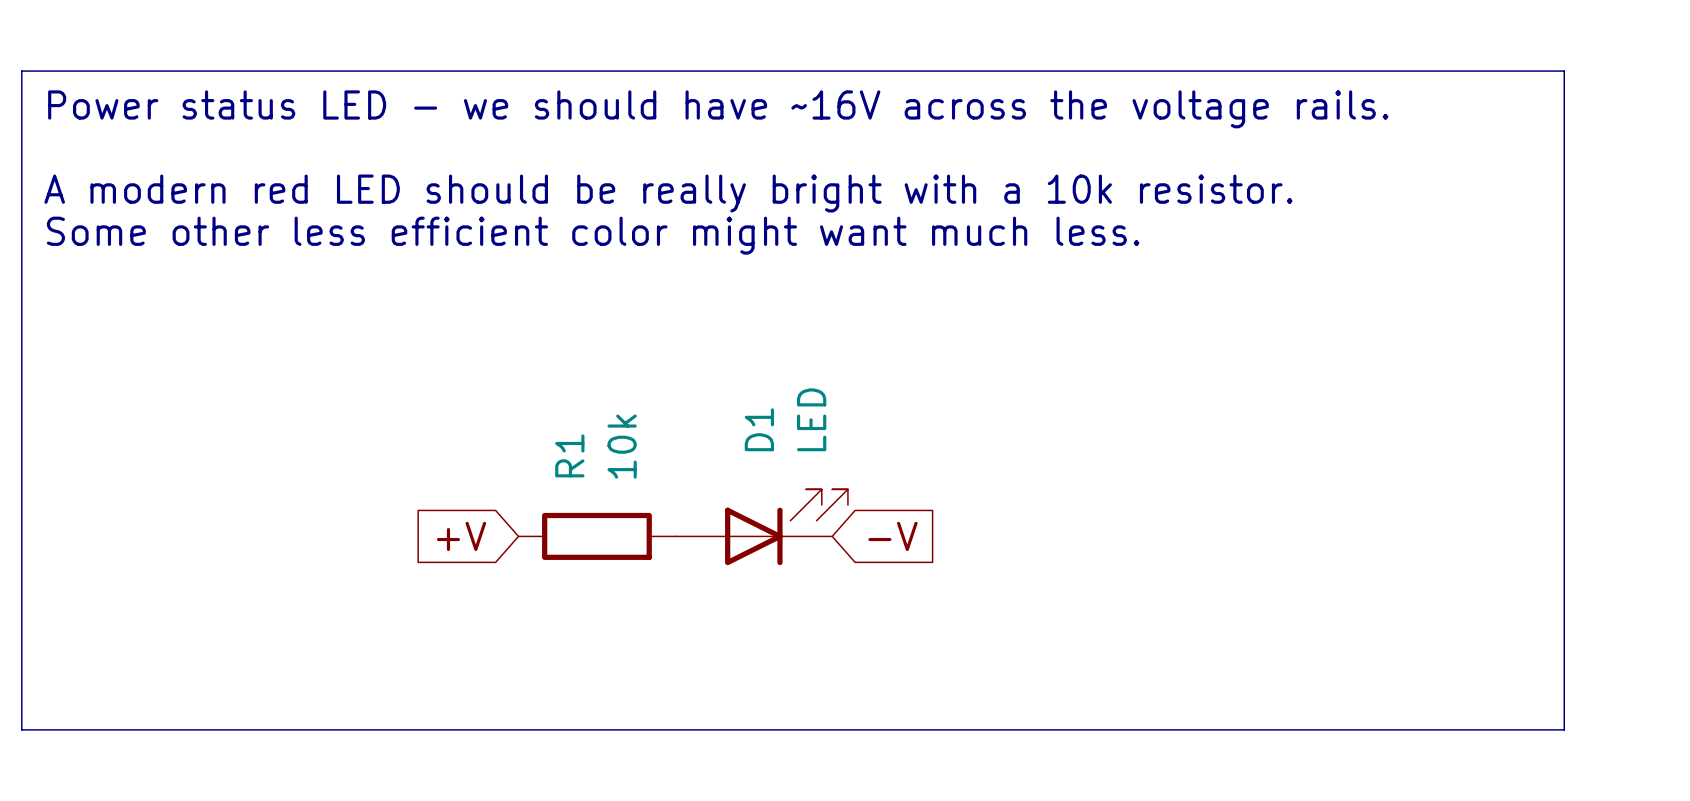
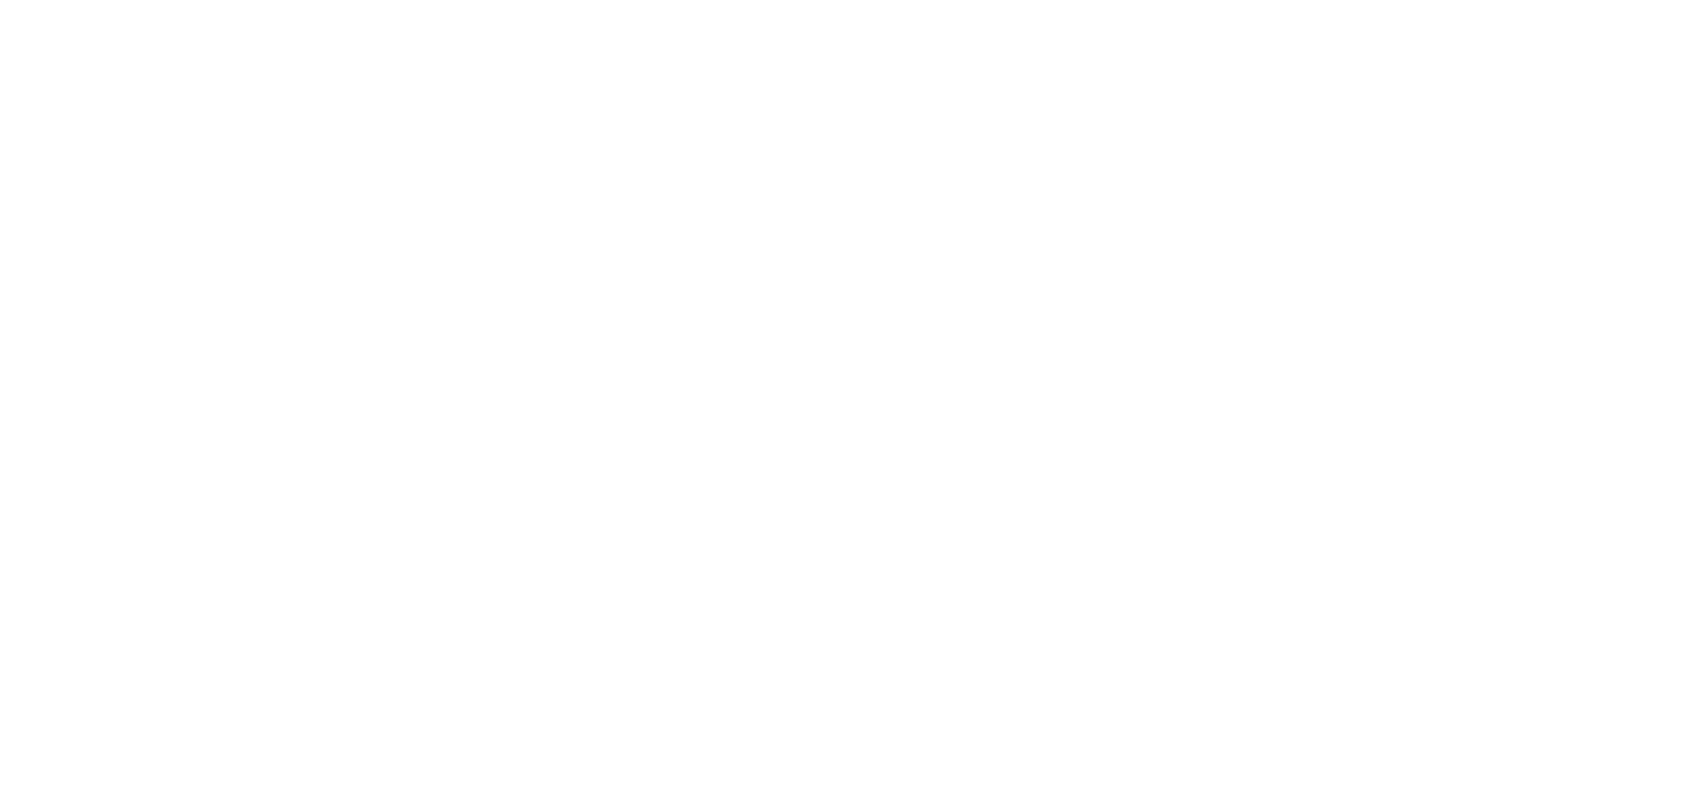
line: (21, 71) (1564, 71) (1564, 729) (21, 729) (21, 71) -> none
text: Power status LED - we should have ~16V across the voltage rails. (718, 109) -> none
text: A modern red LED should be really bright with a 10k resistor. (668, 193) -> none
text: Some other less efficient color might want much less. (593, 235) -> none
D1: LED (761, 527) -> none
global label: +V (461, 536) -> none
R1: 10k (596, 536) -> none
global label: -V (892, 536) -> none

